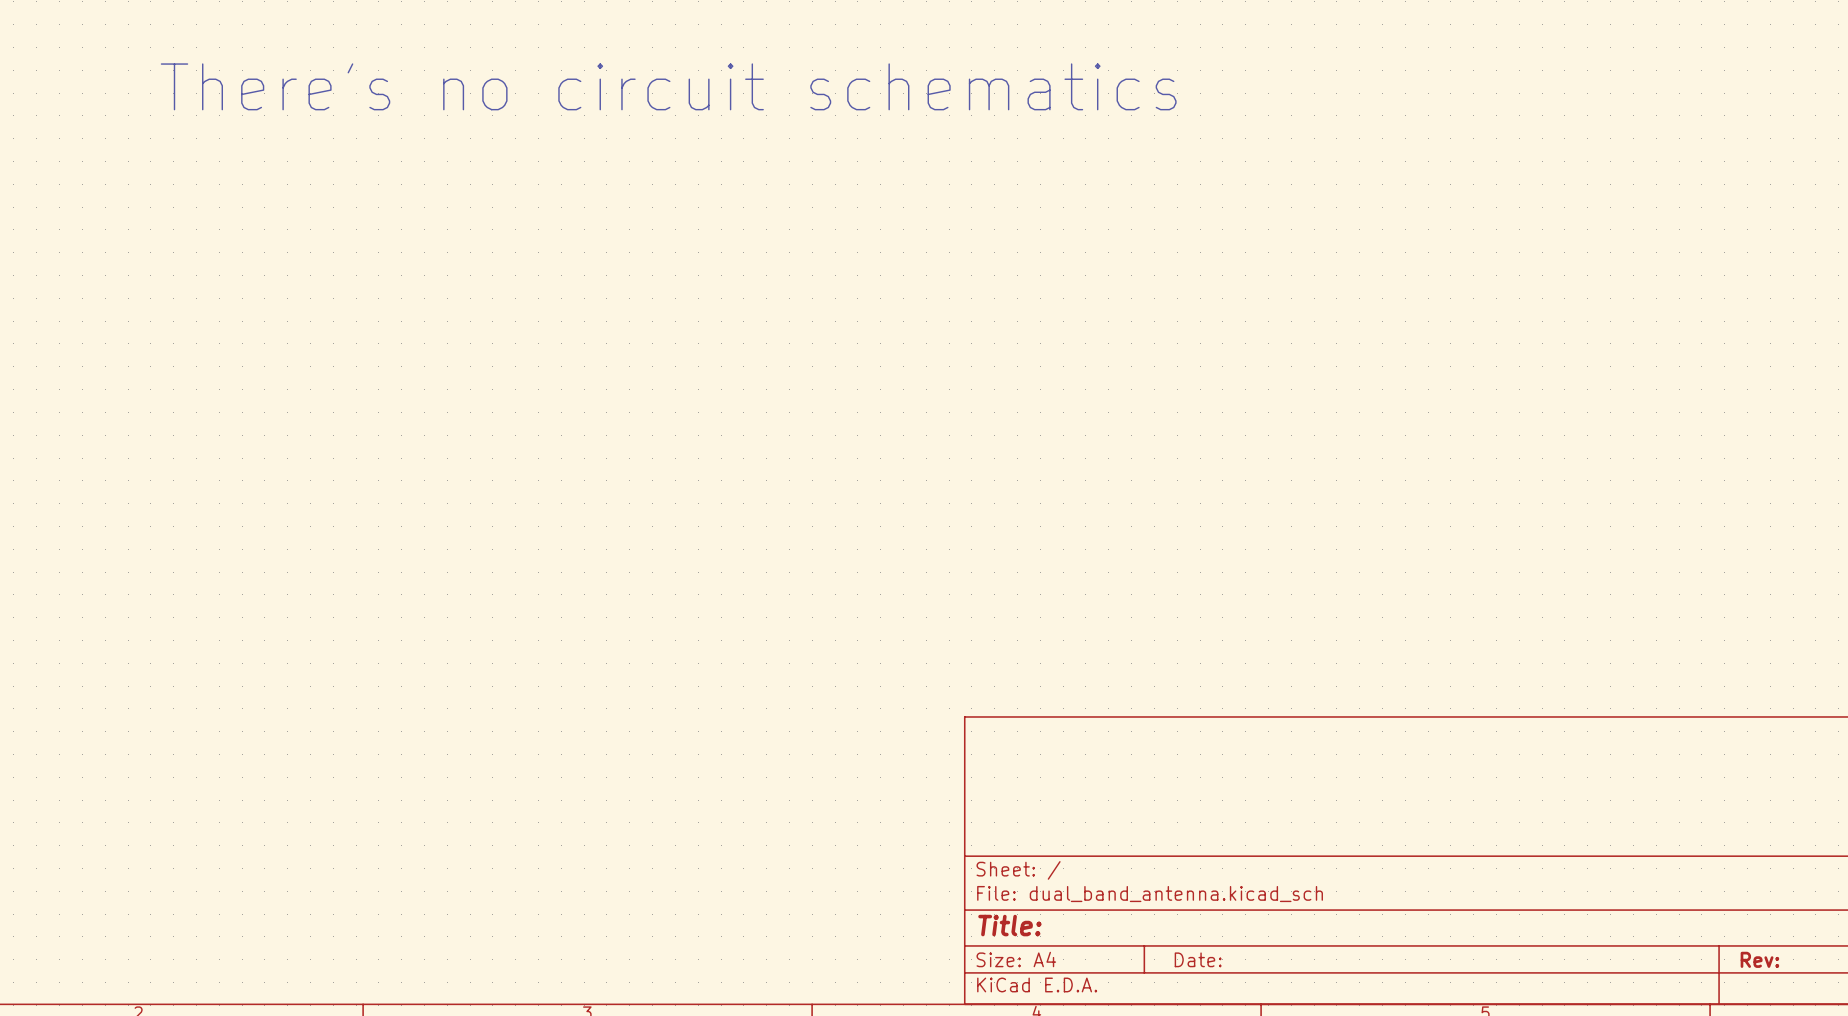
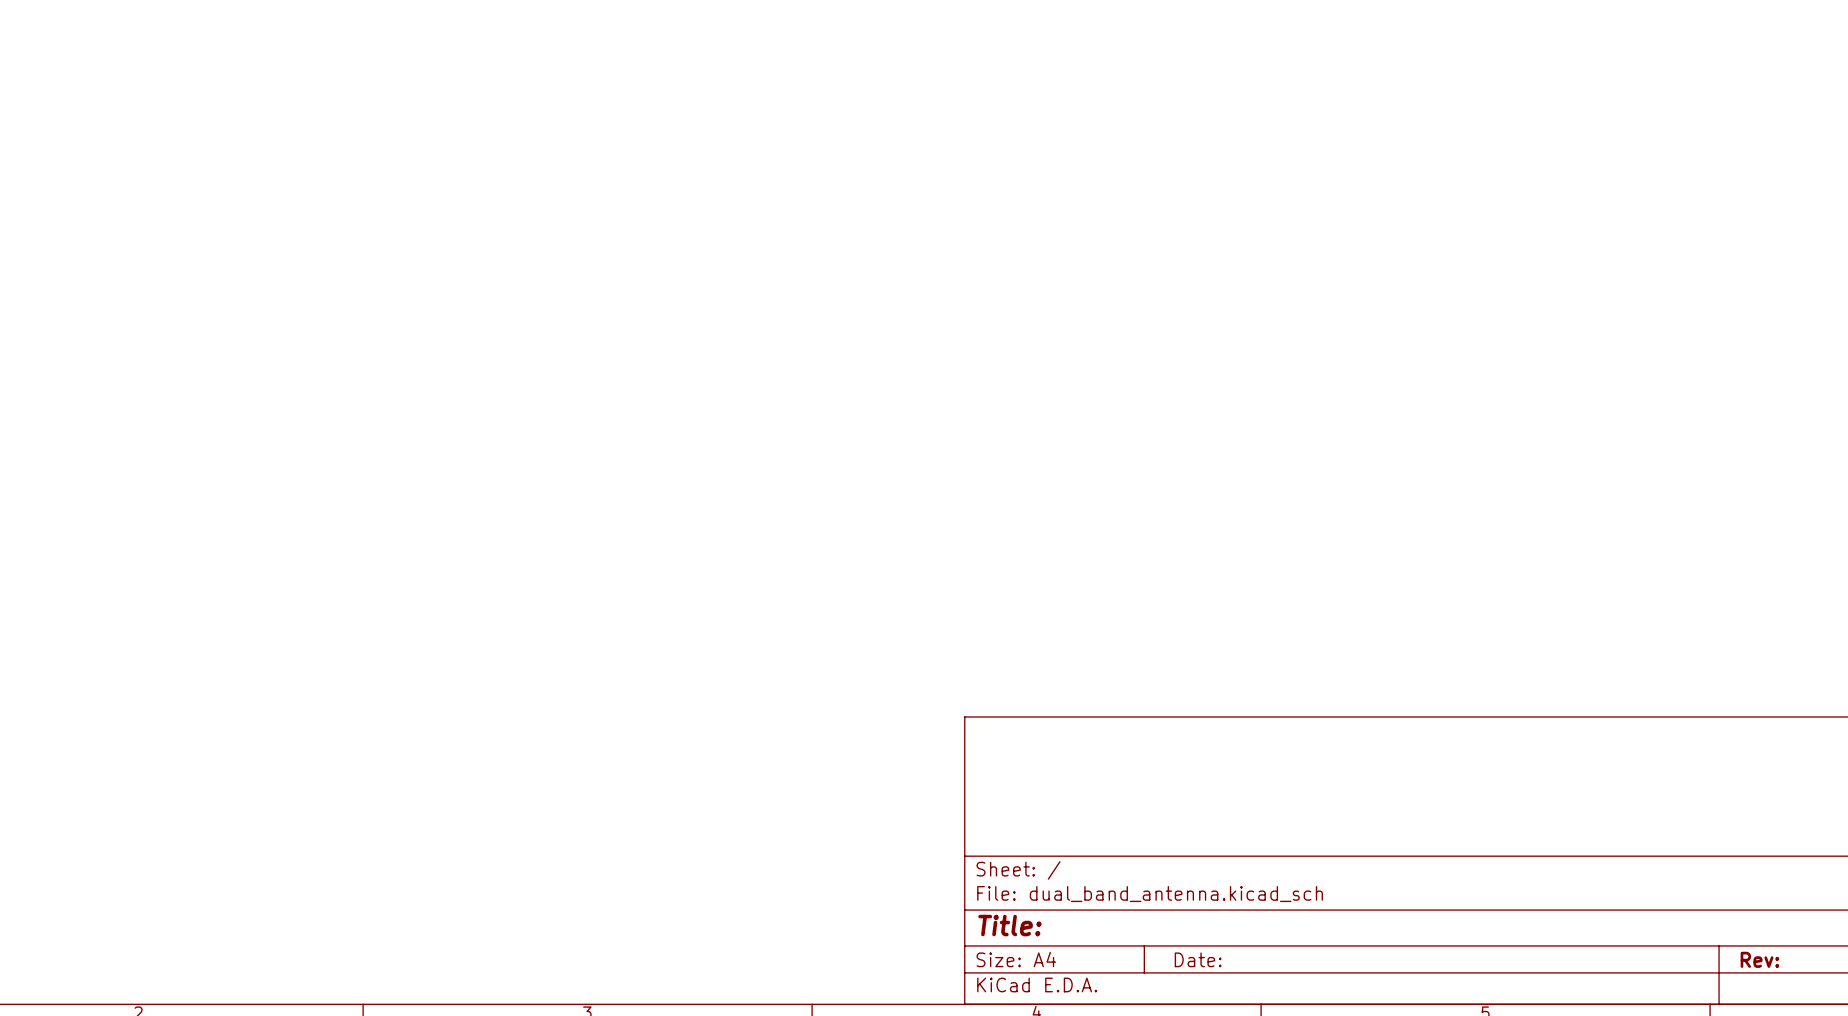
text: There's no circuit schematics (668, 86) -> none

